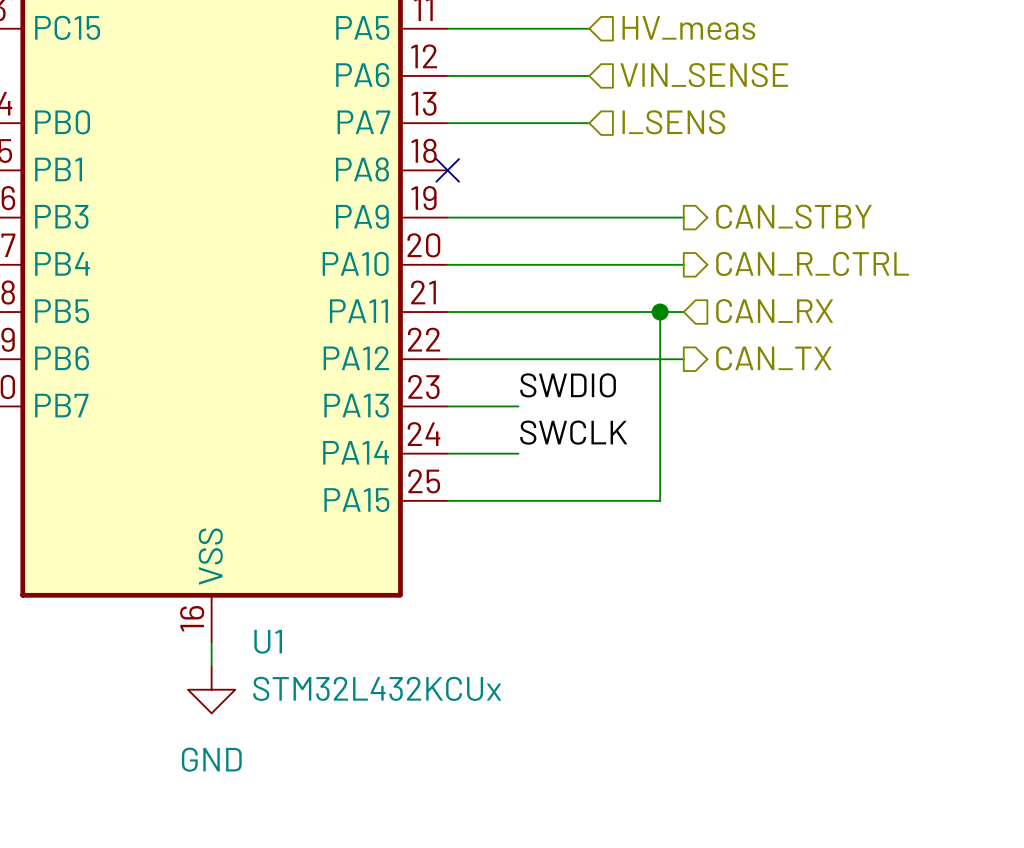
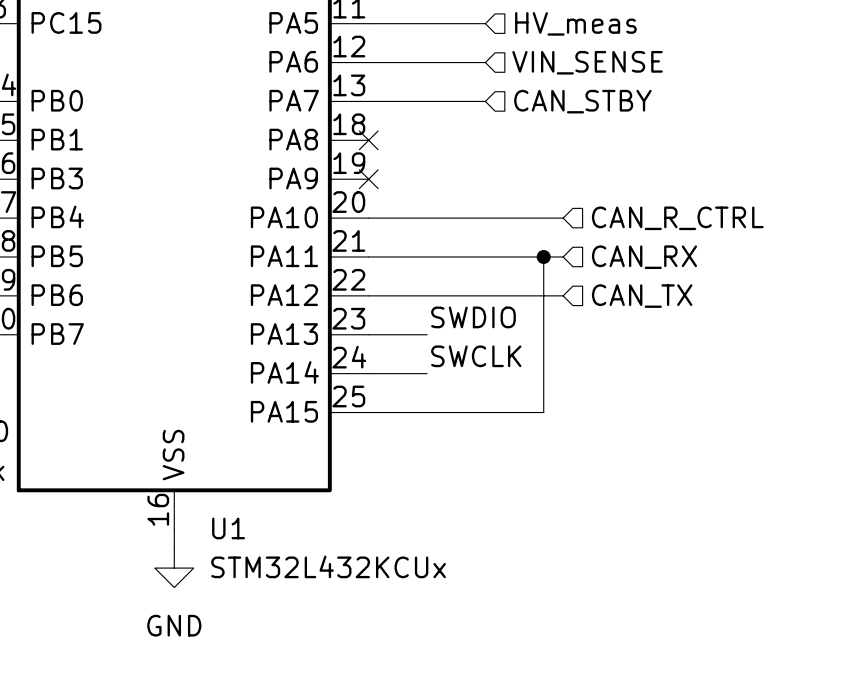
hierarchical label: I_SENS (673, 122) -> CAN_STBY (582, 101)
hierarchical label: CAN_STBY (793, 216) -> none
wire: (447, 217) (683, 217) -> none
no-connect mark: none -> (368, 179)
hierarchical label shape: output (812, 263) -> input (677, 218)
hierarchical label shape: output (773, 358) -> input (642, 296)

